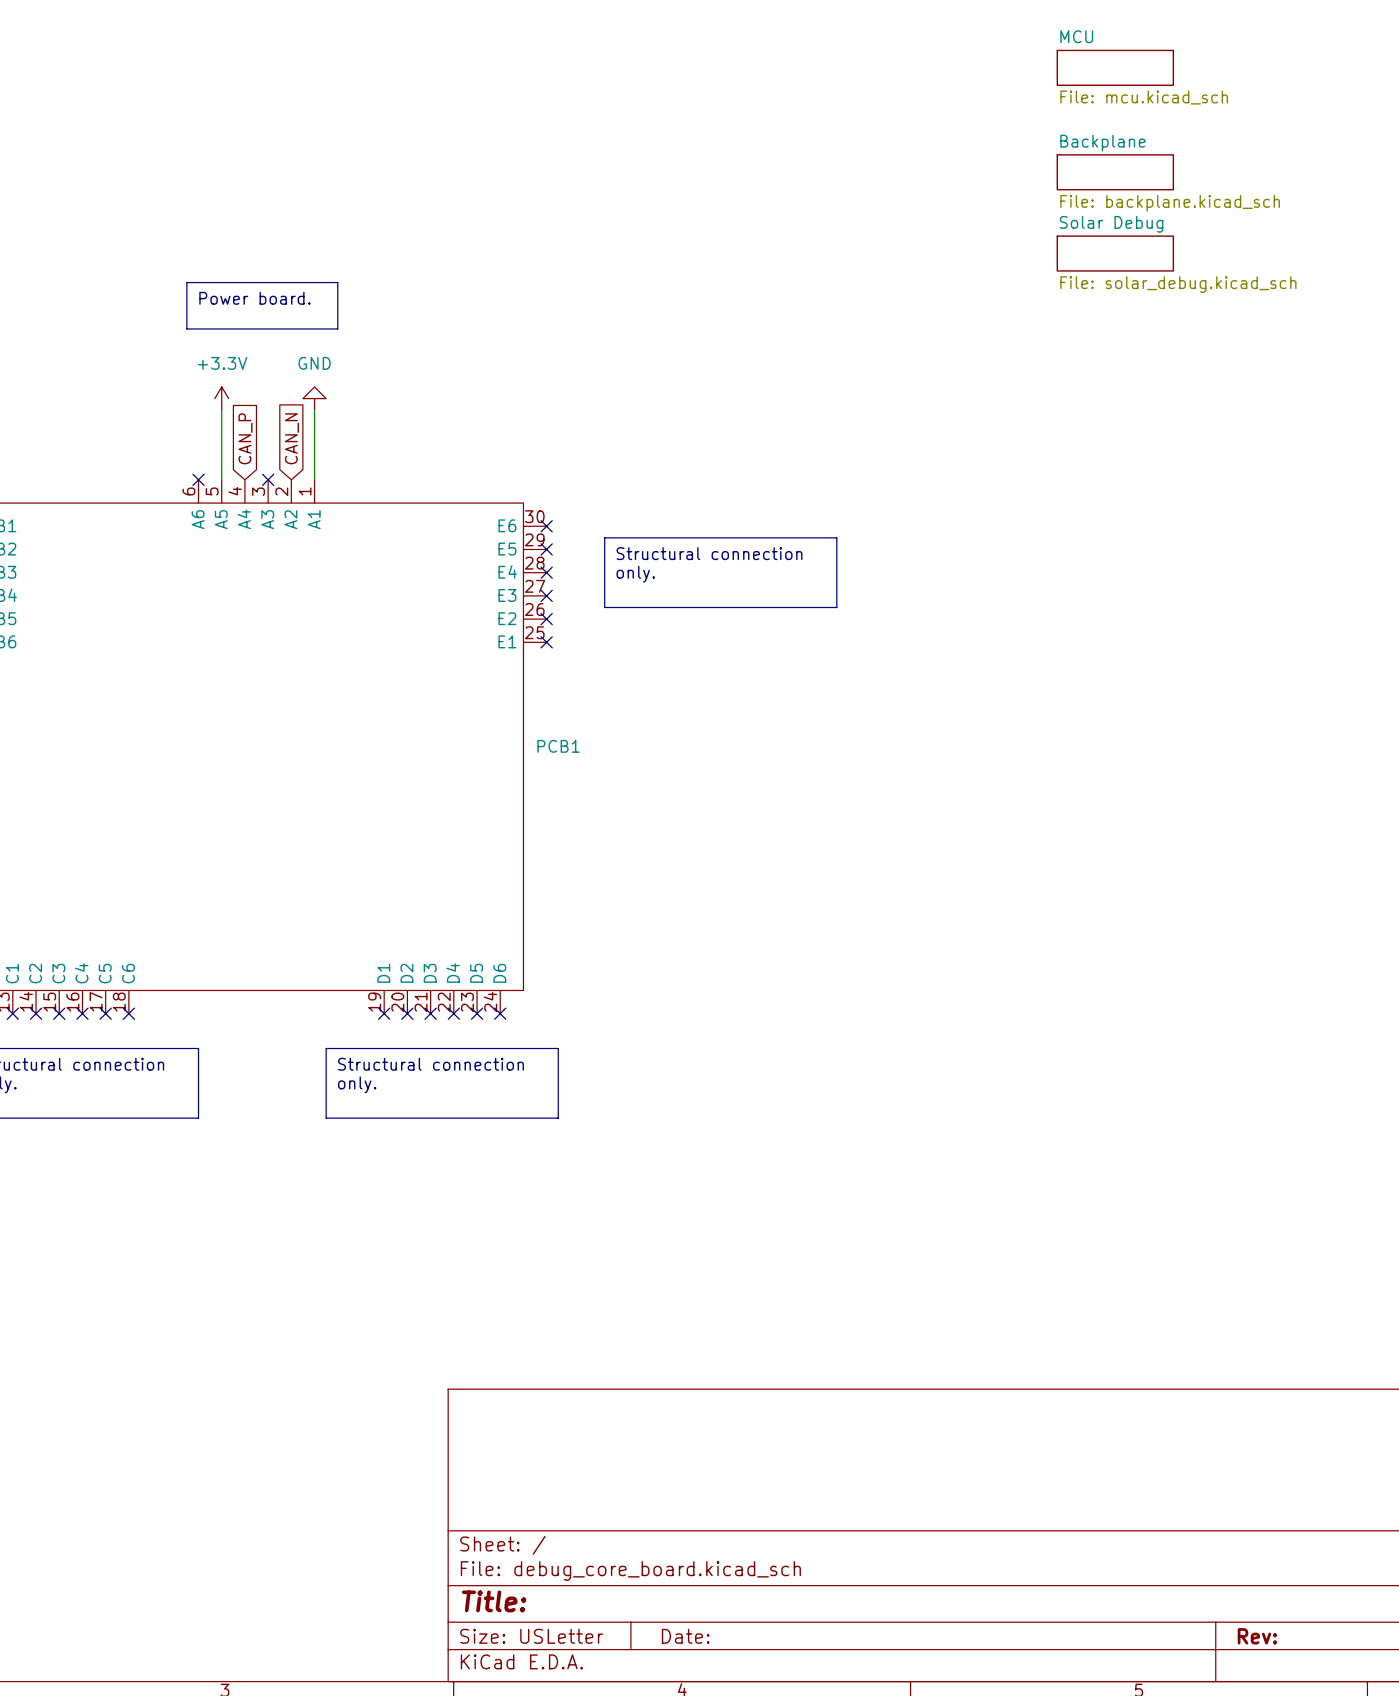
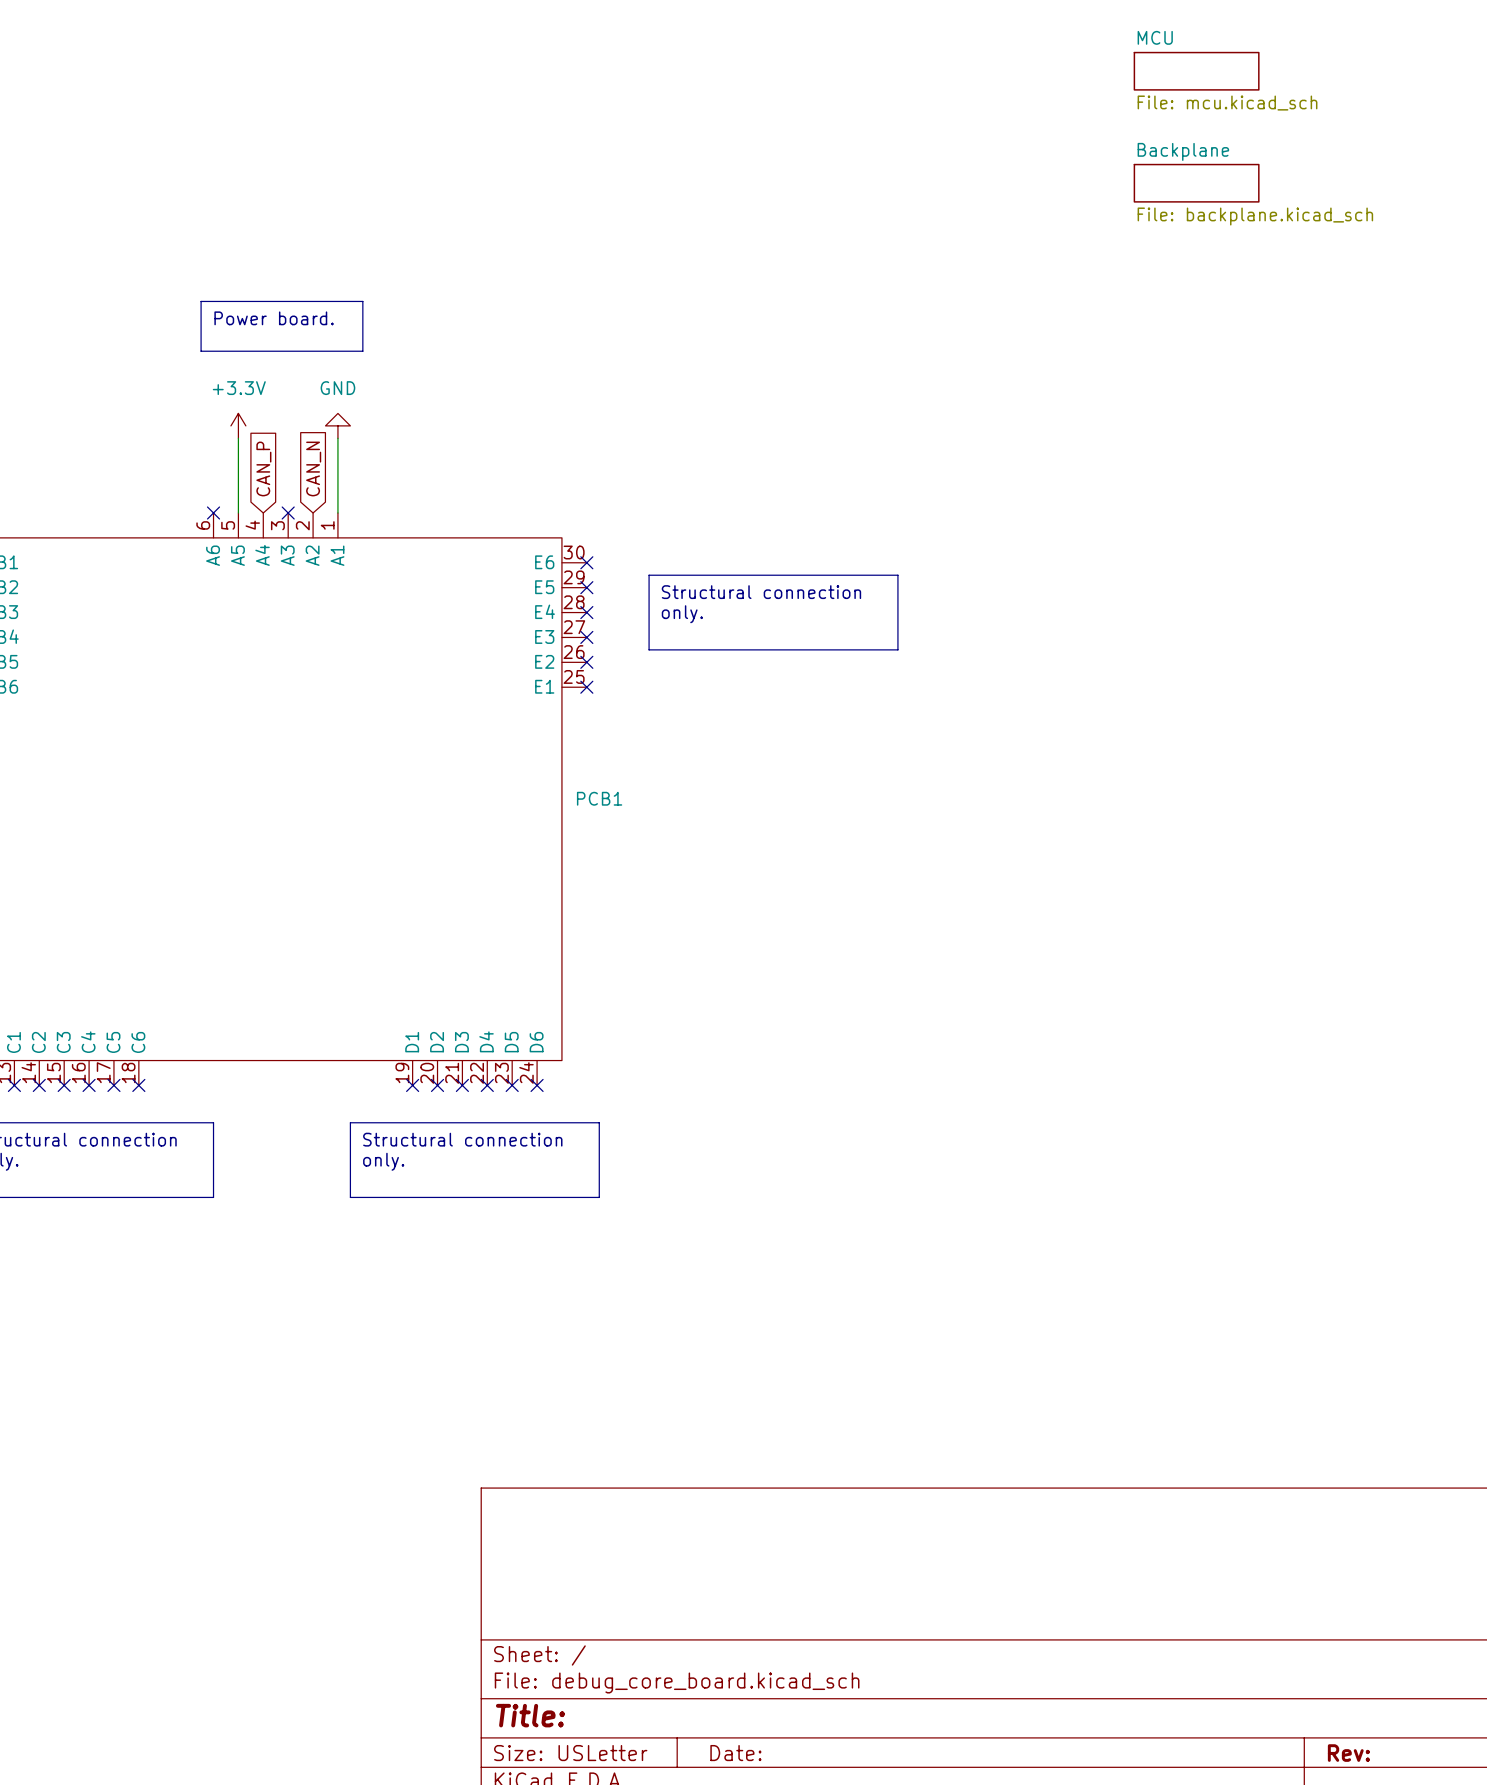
sheet Solar Debug: File: solar_debug.kicad_sch (1115, 253) -> none

